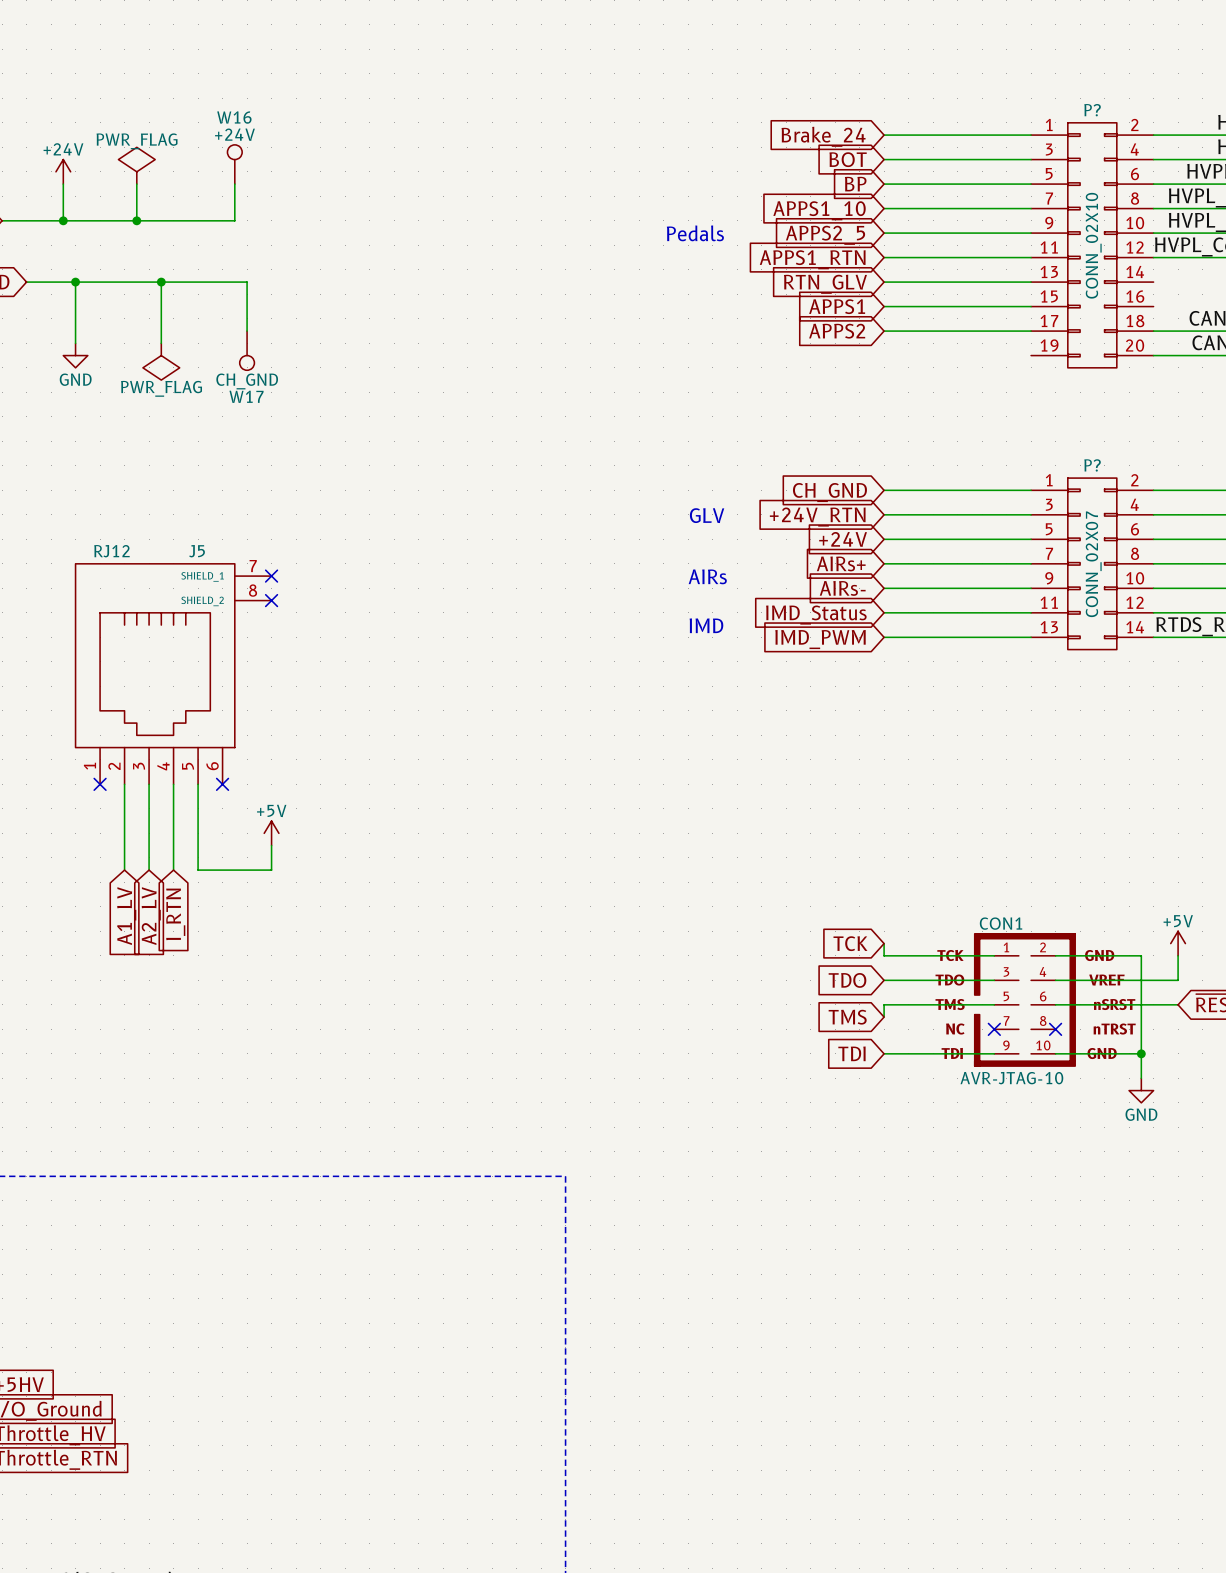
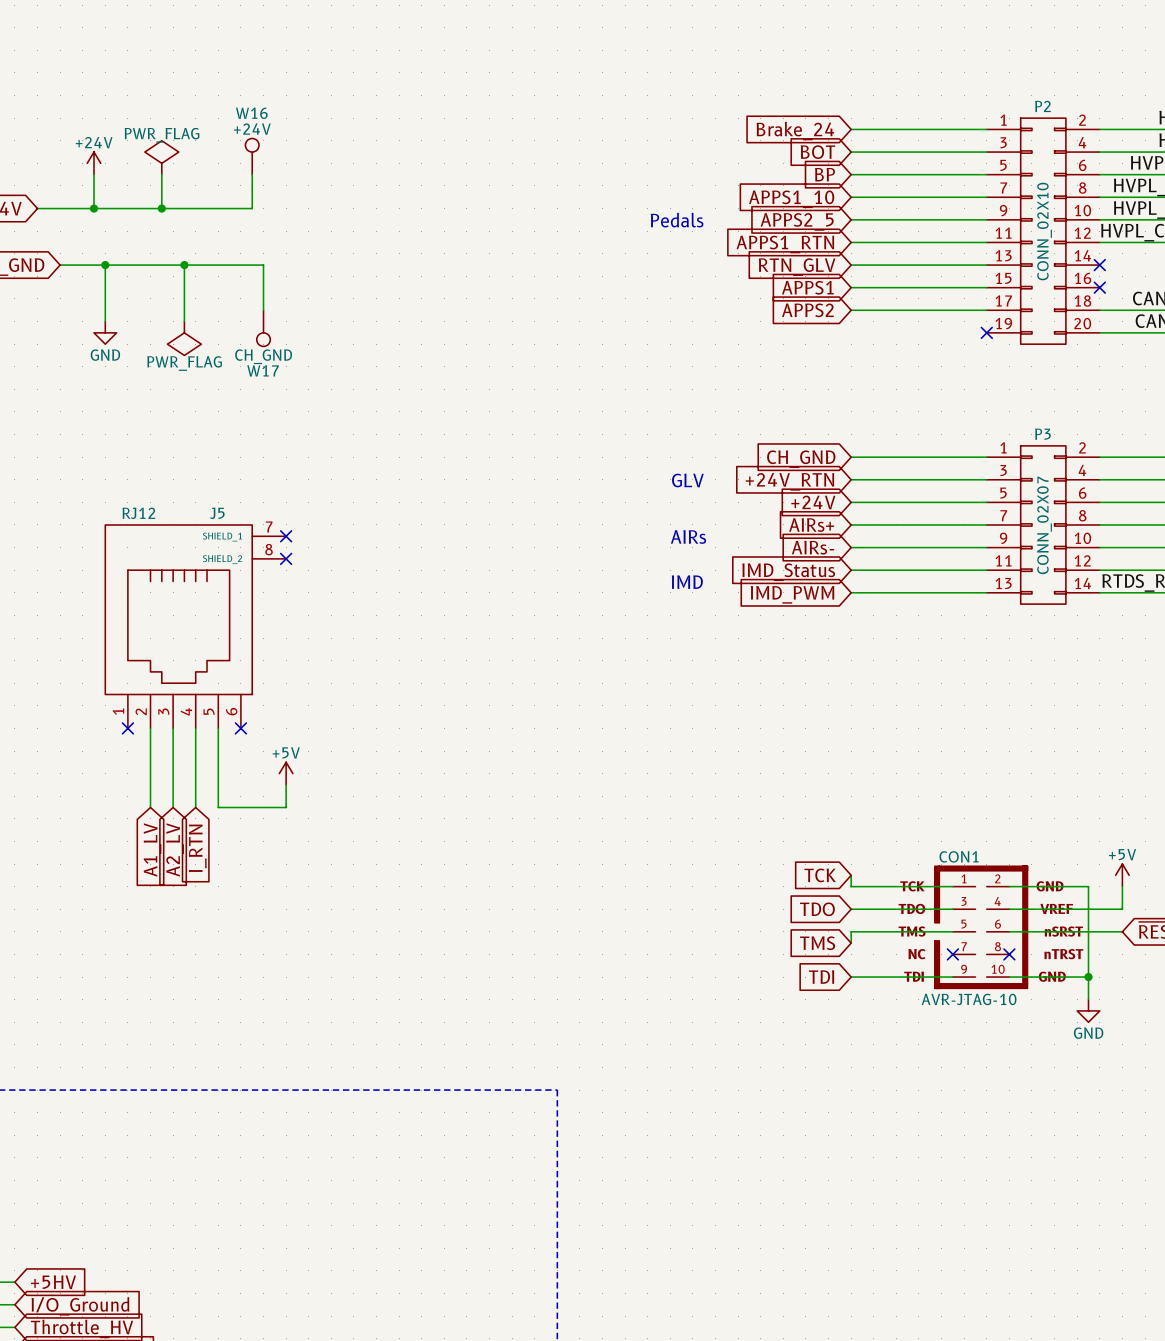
P? name: P? (1092, 110) -> P2 (1042, 106)
no-connect mark: none -> (1099, 265)
no-connect mark: none -> (1099, 287)
no-connect mark: none -> (986, 332)
P? name: P? (1092, 465) -> P3 (1042, 434)

